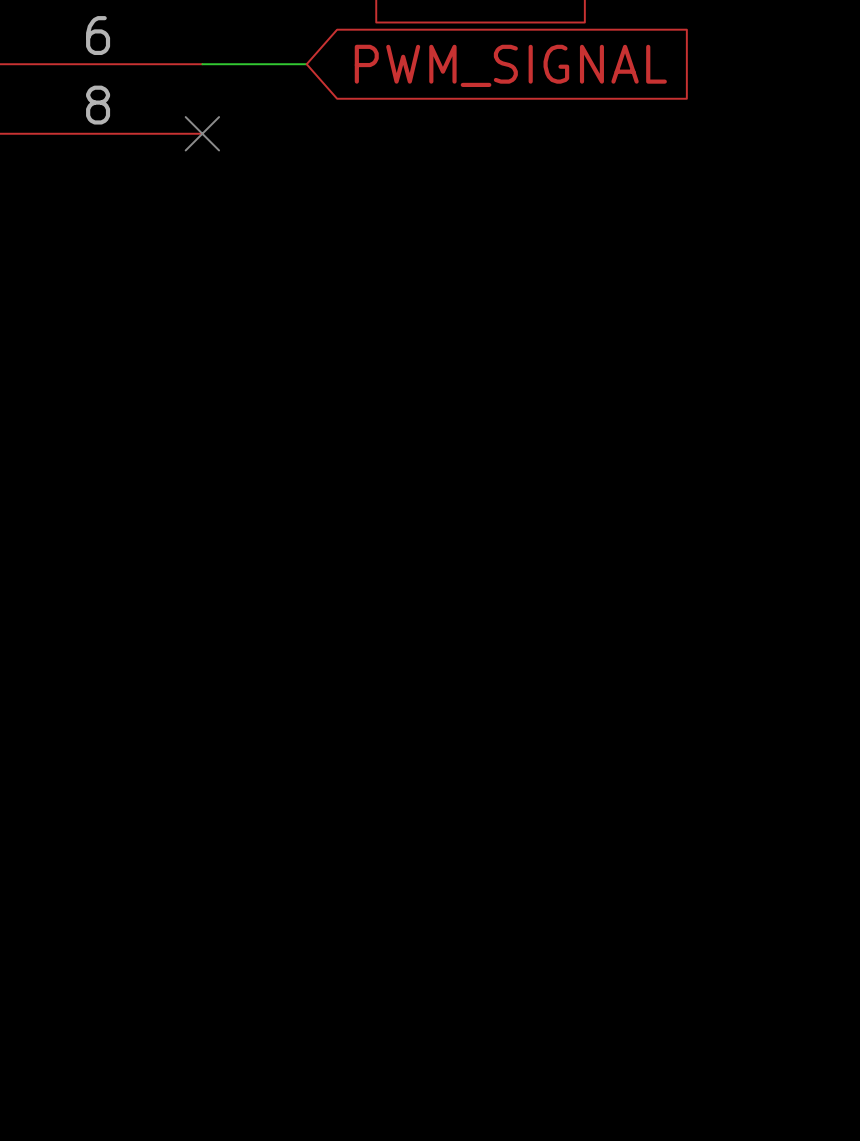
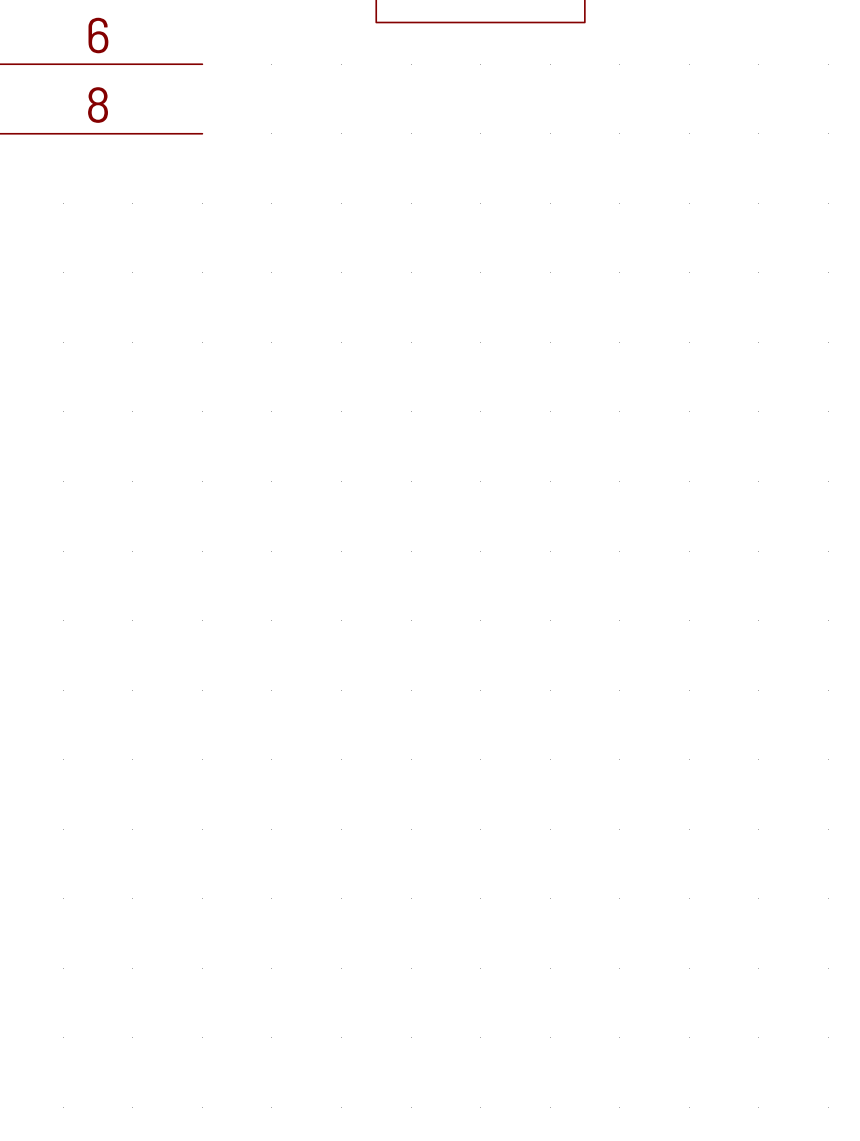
wire: (202, 64) (306, 64) -> none
global label: PWM_SIGNAL (510, 65) -> none
no-connect mark: (202, 133) -> none

